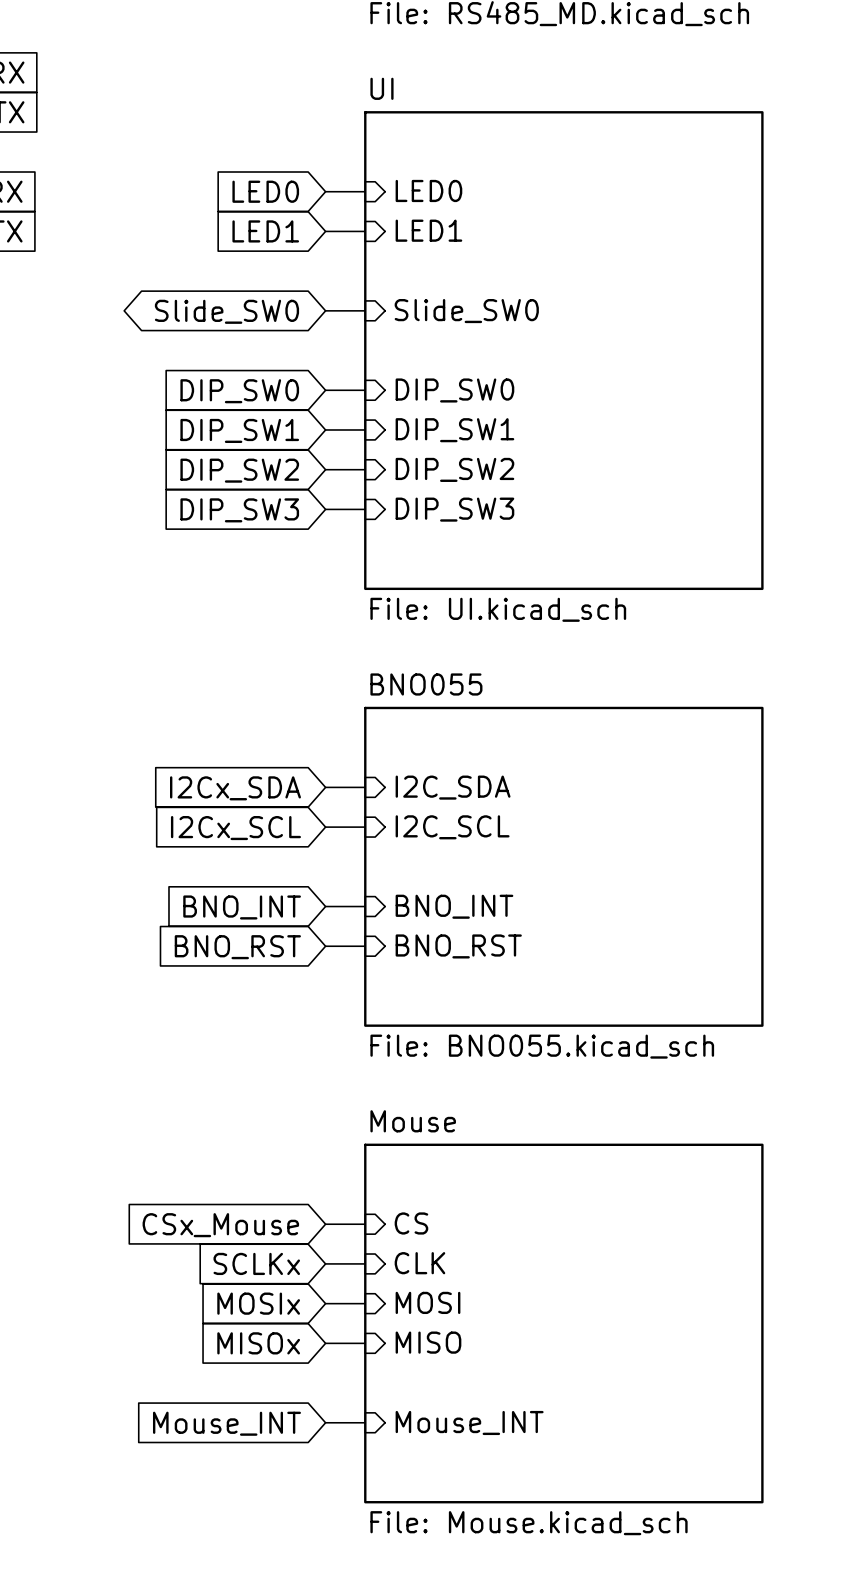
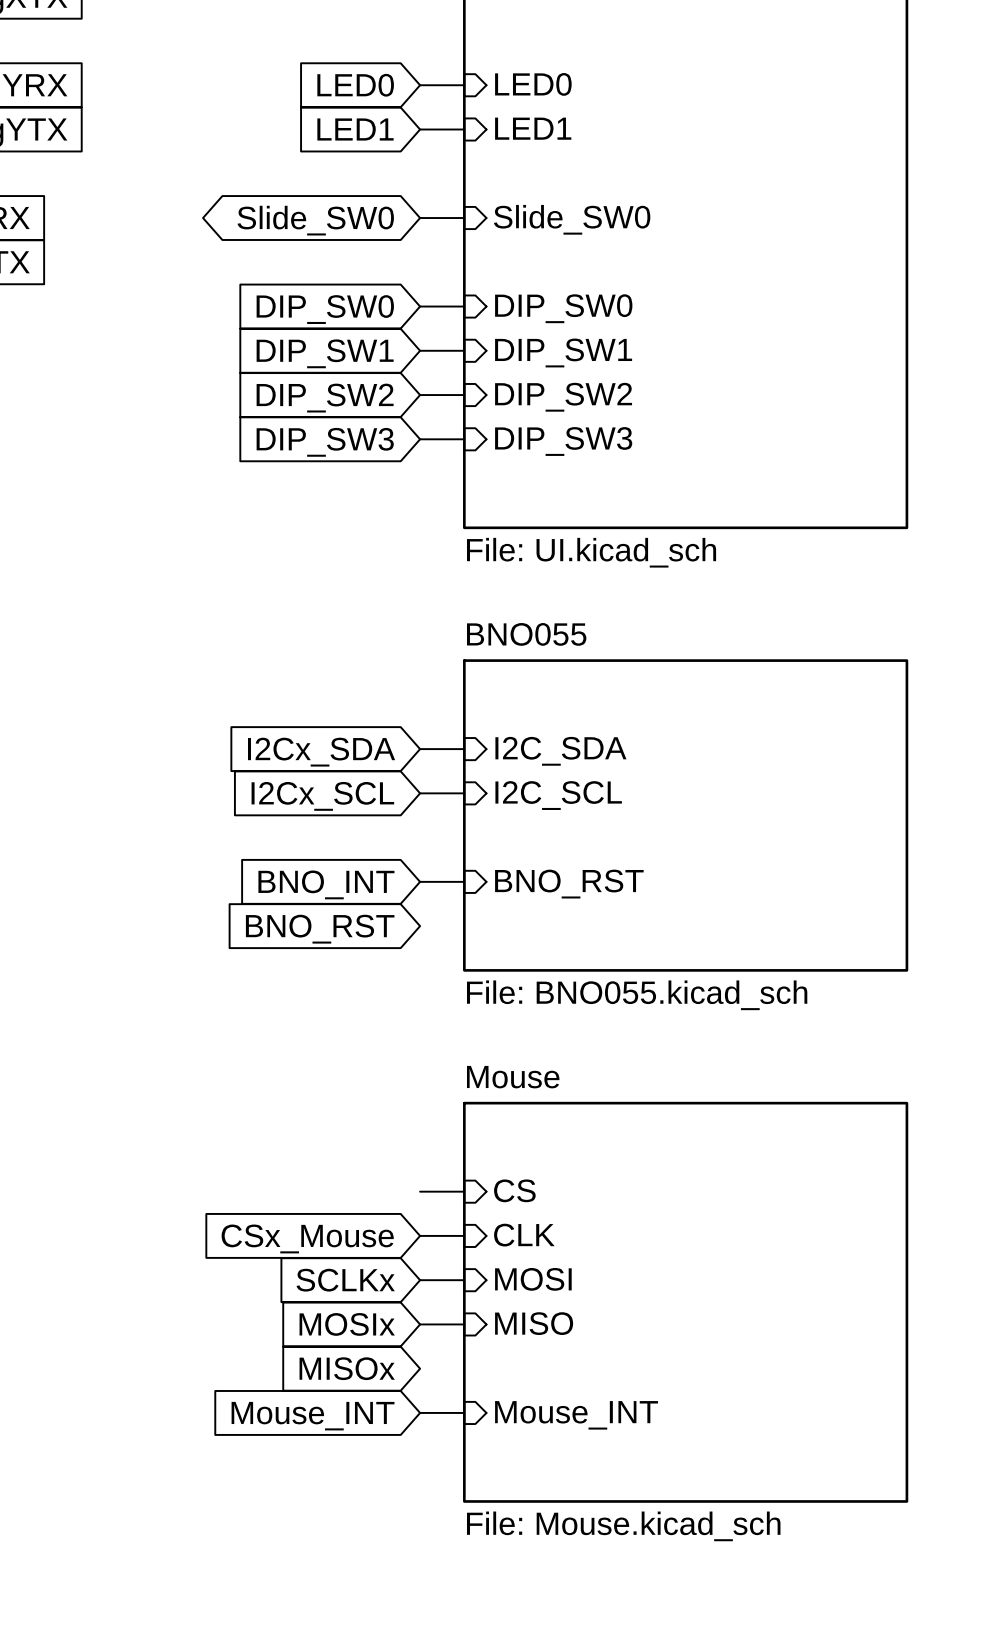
sheet BNO055 shape: [364, 706, 764, 1027] -> [463, 659, 909, 972]
sheet pin: BNO_INT (454, 906) -> BNO_RST (569, 884)
wire: (325, 946) (365, 946) -> (420, 1191) (464, 1191)
sheet pin: BNO_RST (458, 946) -> none
sheet pin: none -> CS (514, 1190)
sheet pin: CS (411, 1223) -> CLK (524, 1235)
sheet pin: CLK (419, 1263) -> MOSI (533, 1279)
sheet pin: MOSI (428, 1302) -> MISO (534, 1323)
sheet Mouse position: (563, 1323) -> (685, 1302)
sheet pin: MISO (428, 1342) -> none
wire: (325, 1343) (365, 1343) -> (420, 1412) (464, 1412)
wire: (325, 1422) (365, 1422) -> none
sheet pin position: Mouse_INT (469, 1422) -> Mouse_INT (576, 1415)
global label position: Mouse_INT (226, 1423) -> Mouse_INT (313, 1416)

